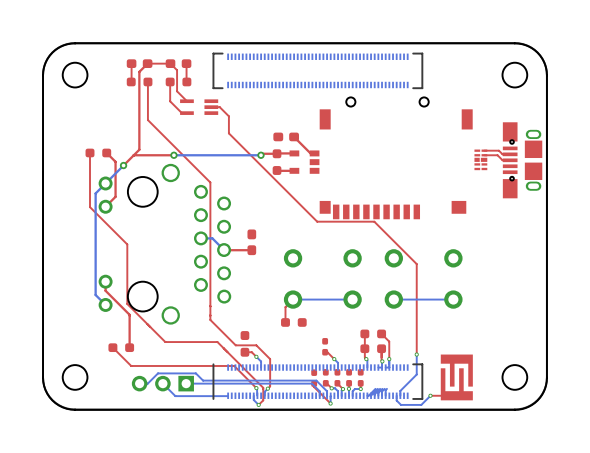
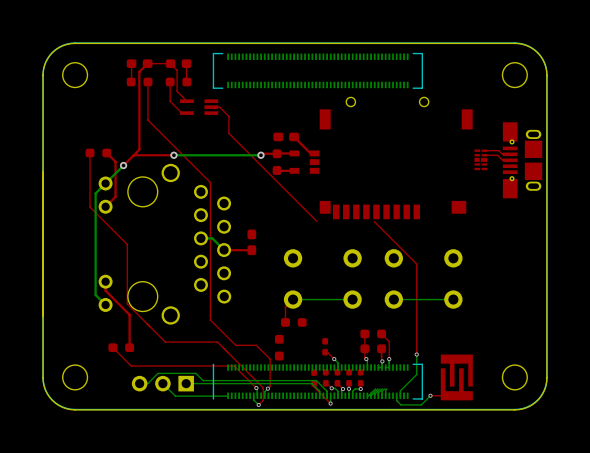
top track: (374, 221) (317, 221) -> none
part position: (244, 343) -> (279, 347)
top track: (244, 352) (251, 352) (256, 356) -> none
bottom track: (256, 356) (261, 361) (261, 367) -> none
via: (256, 356) -> none

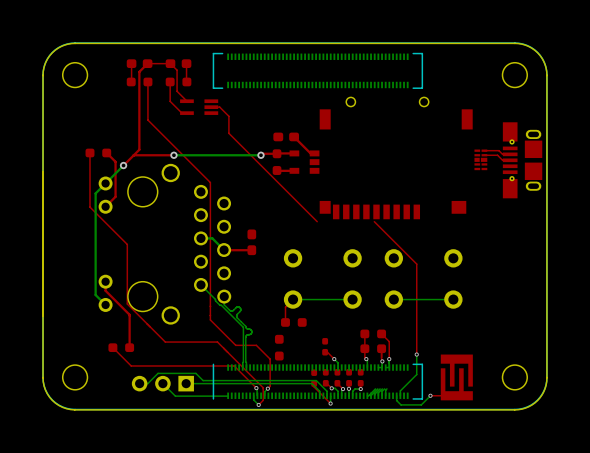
bottom track: none -> (200, 284) (243, 327) (242, 367)
bottom track: none -> (224, 296) (224, 304) (230, 310) (237, 307) (240, 308) (237, 317) (251, 331) (245, 336) (246, 367)

